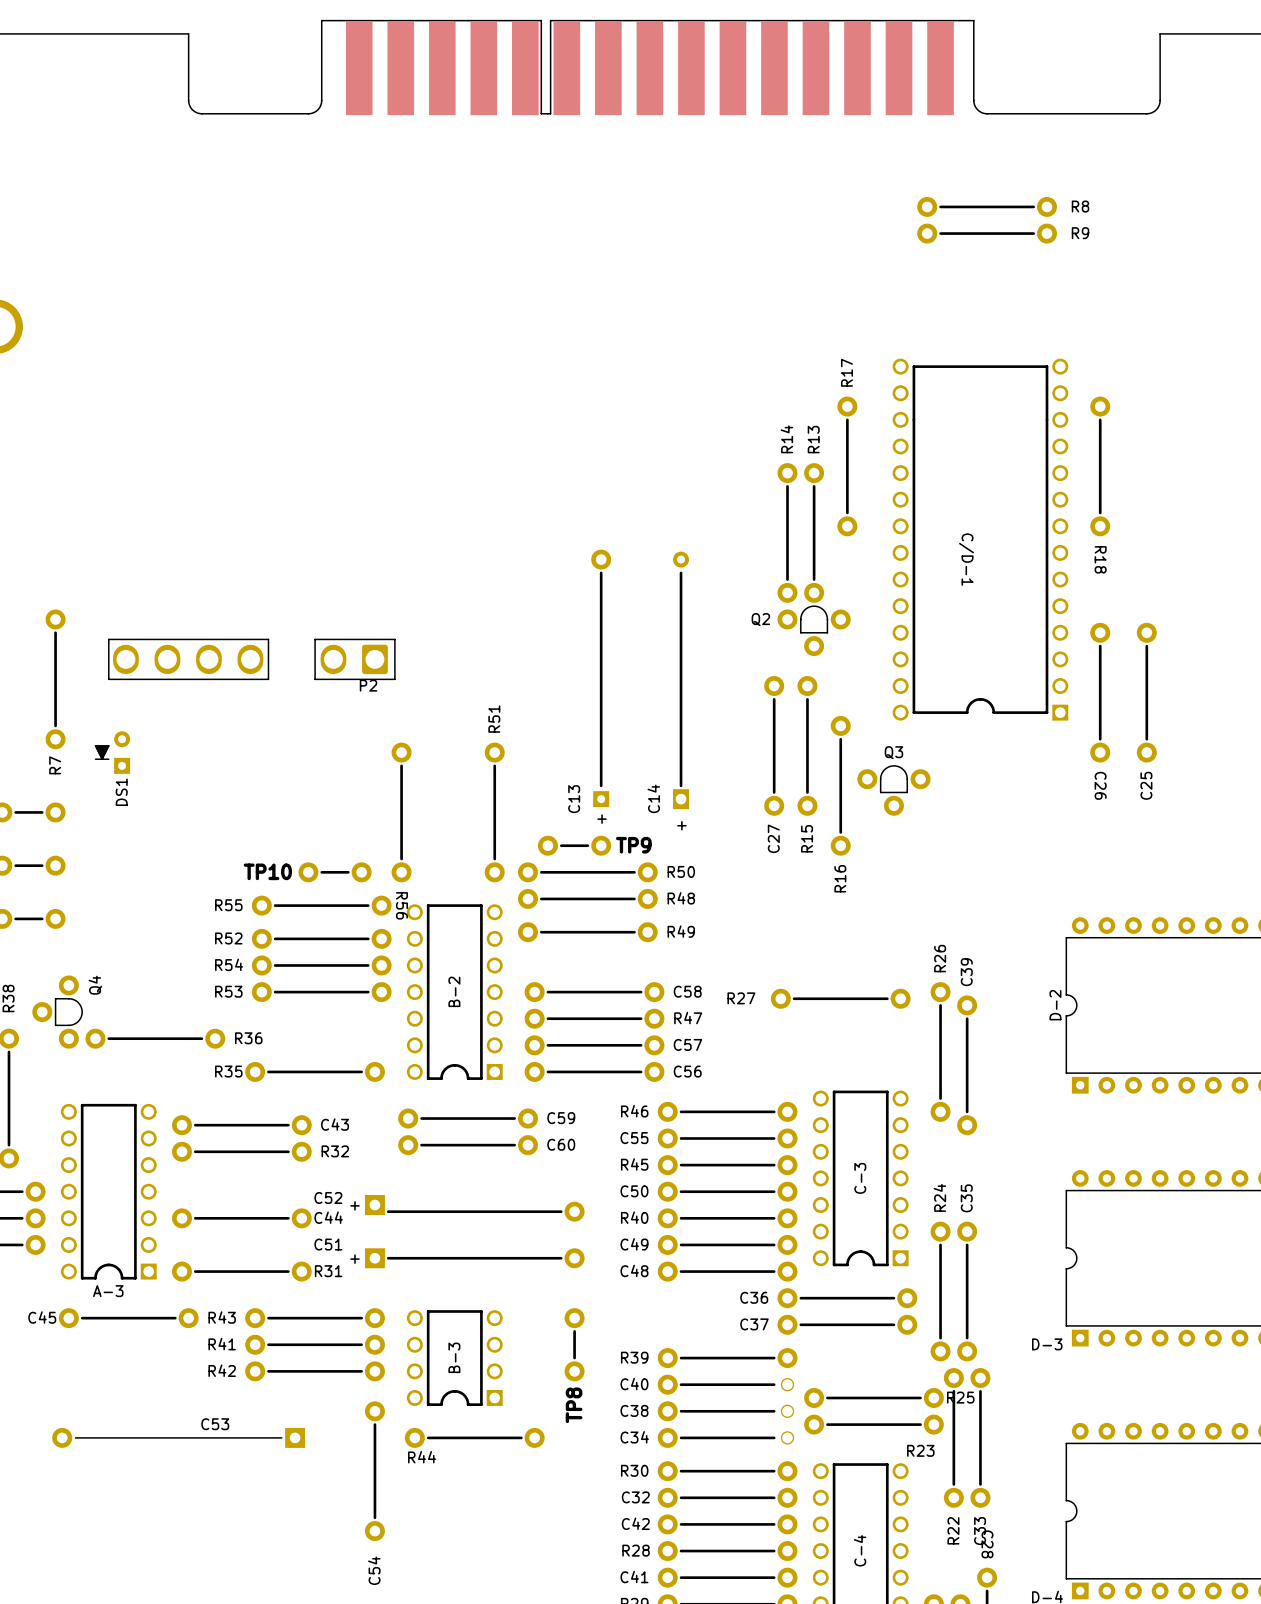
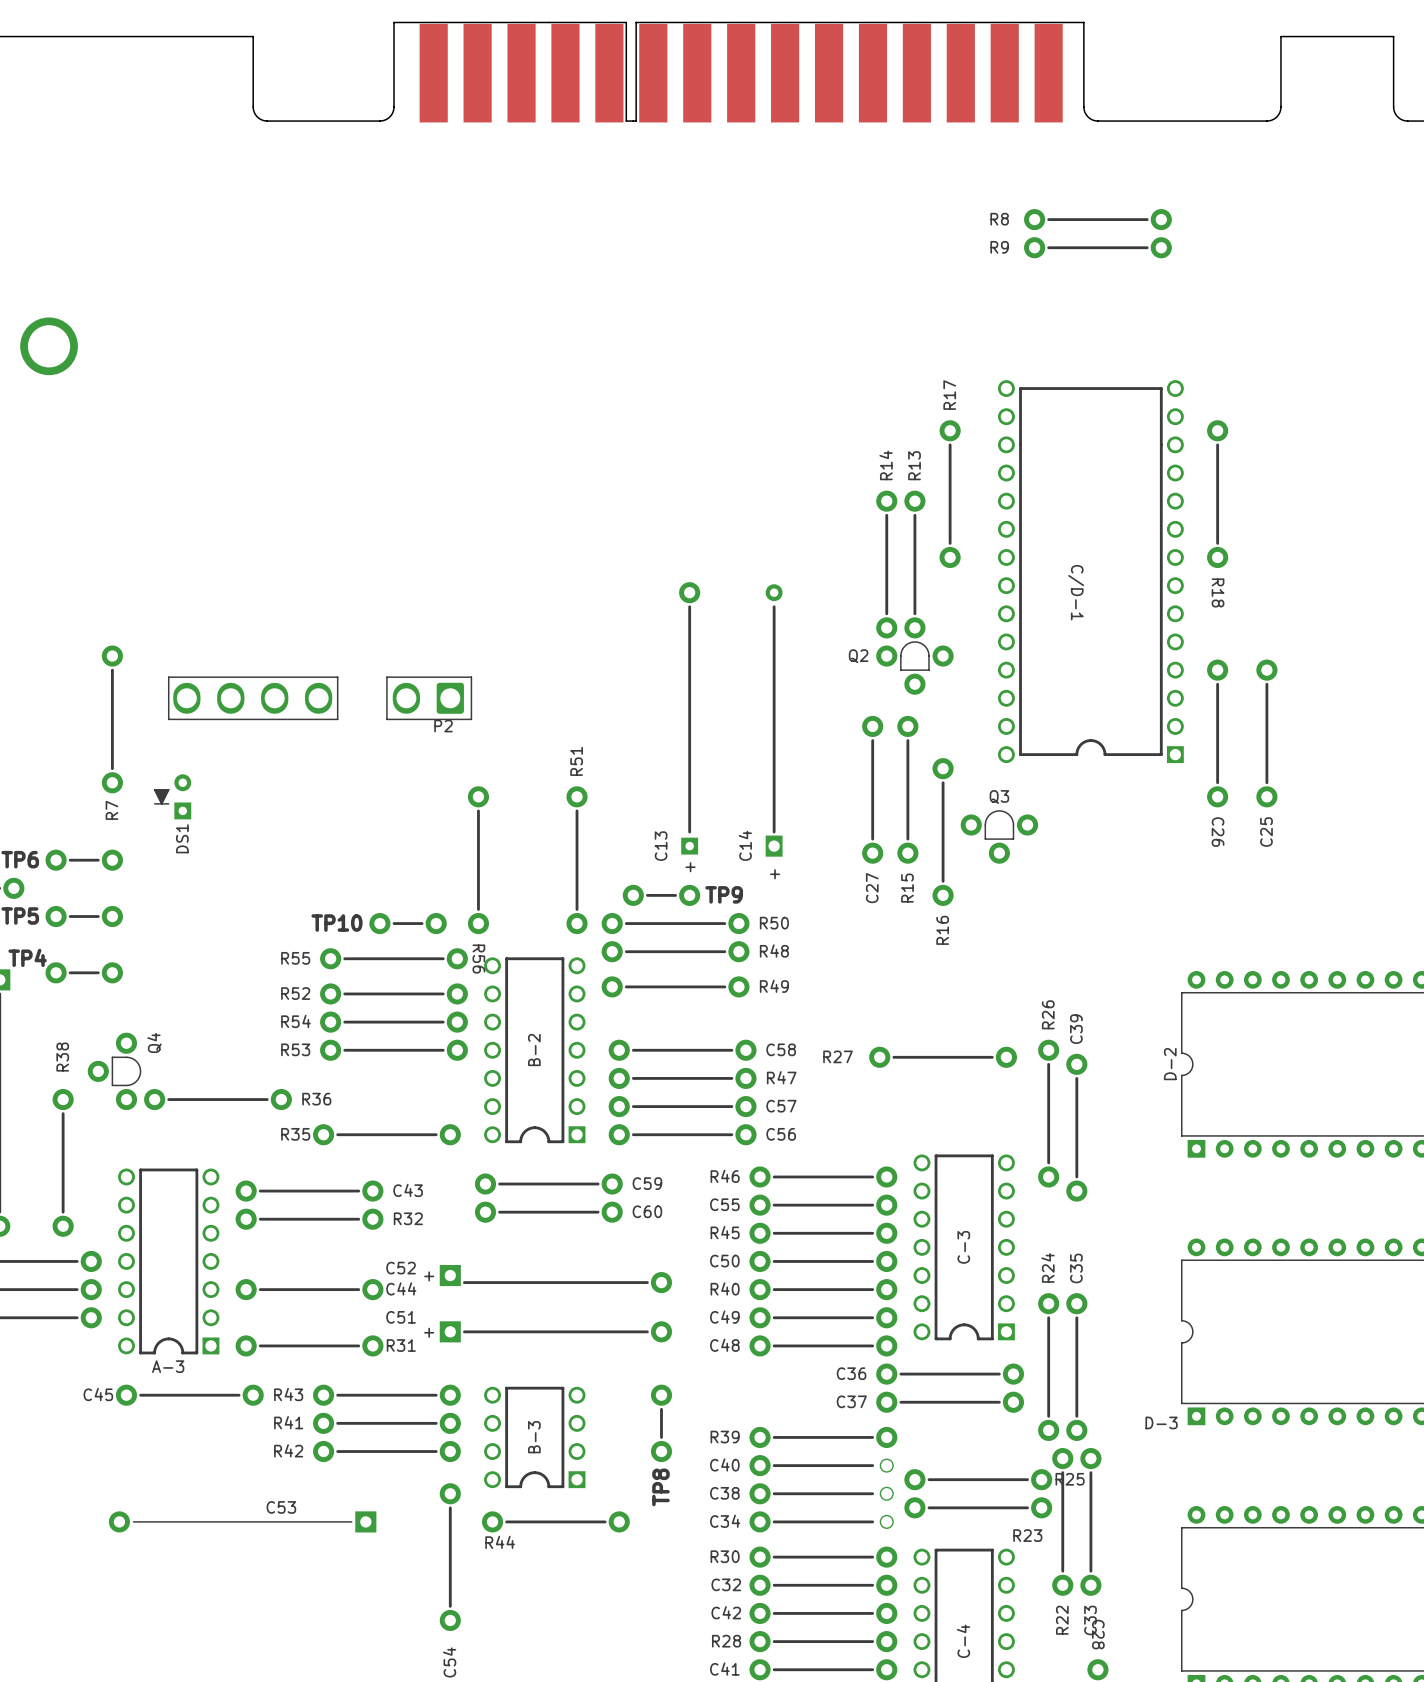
R8 name position: R8 (1080, 206) -> R8 (999, 219)
R9 name position: R9 (1080, 233) -> R9 (999, 247)

